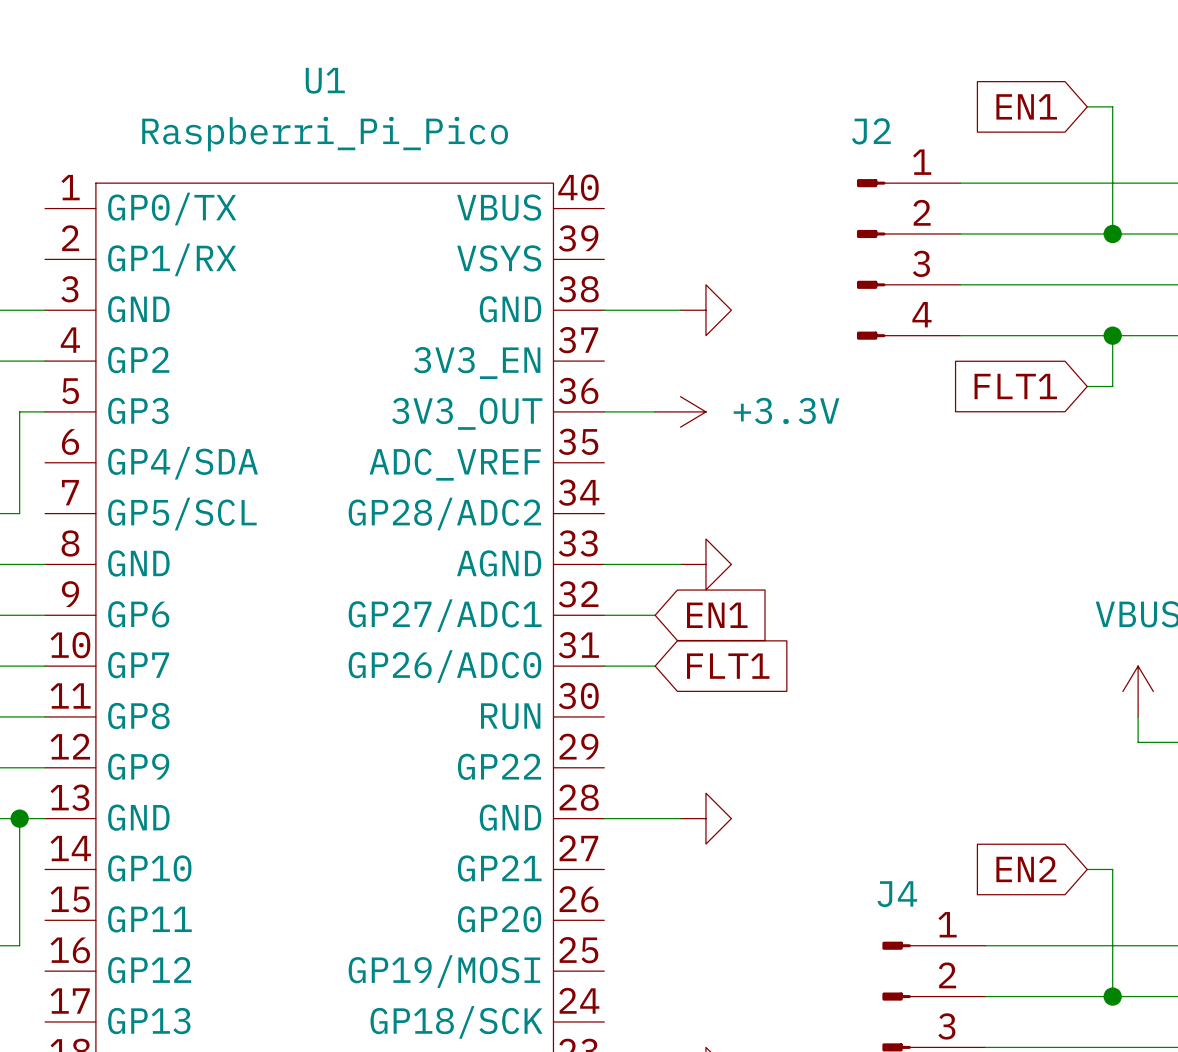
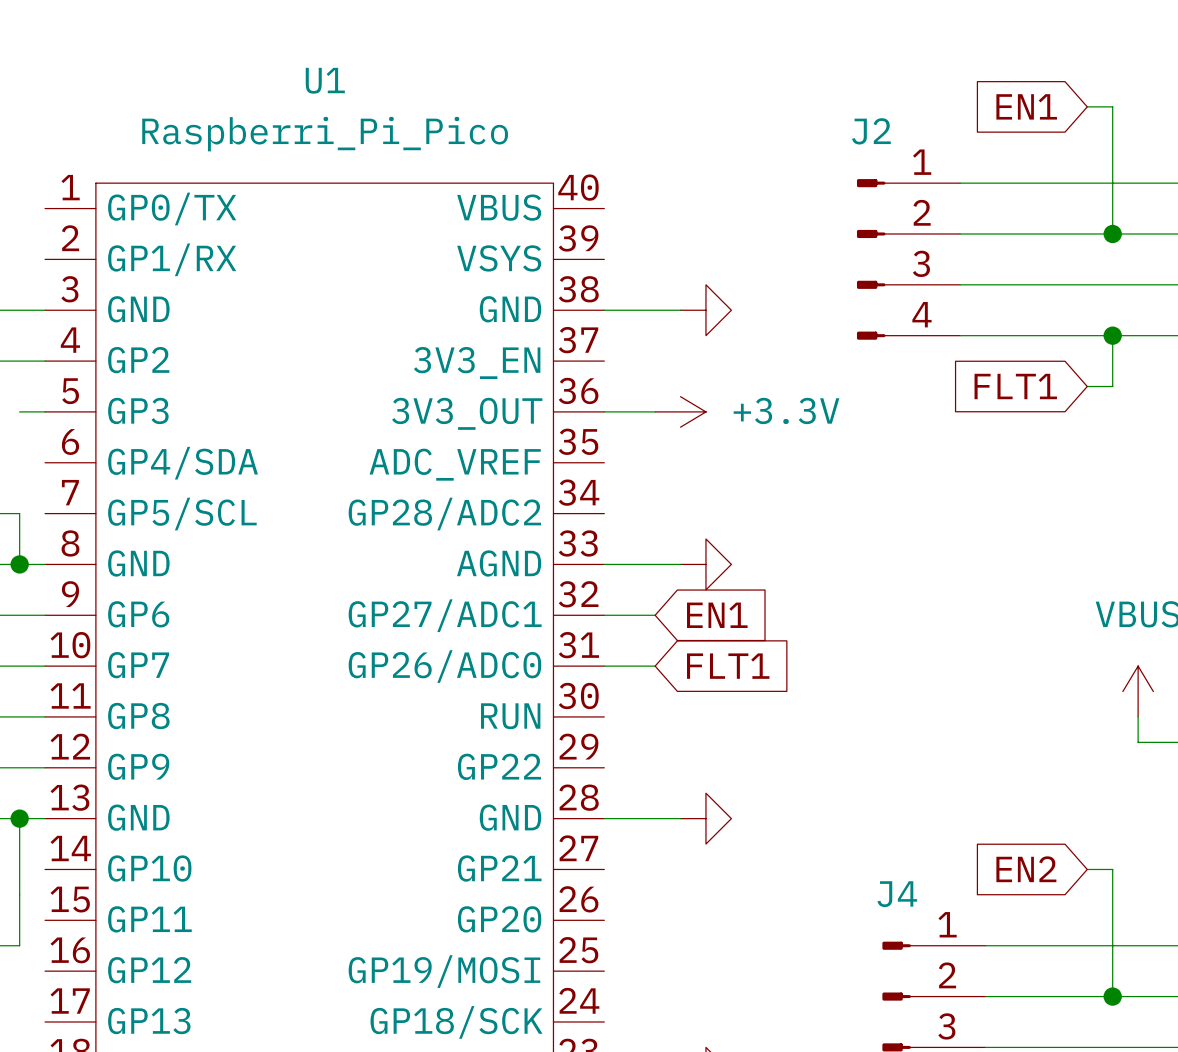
wire: (19, 411) (19, 513) -> (19, 564) (19, 513)
junction: none -> (19, 564)

